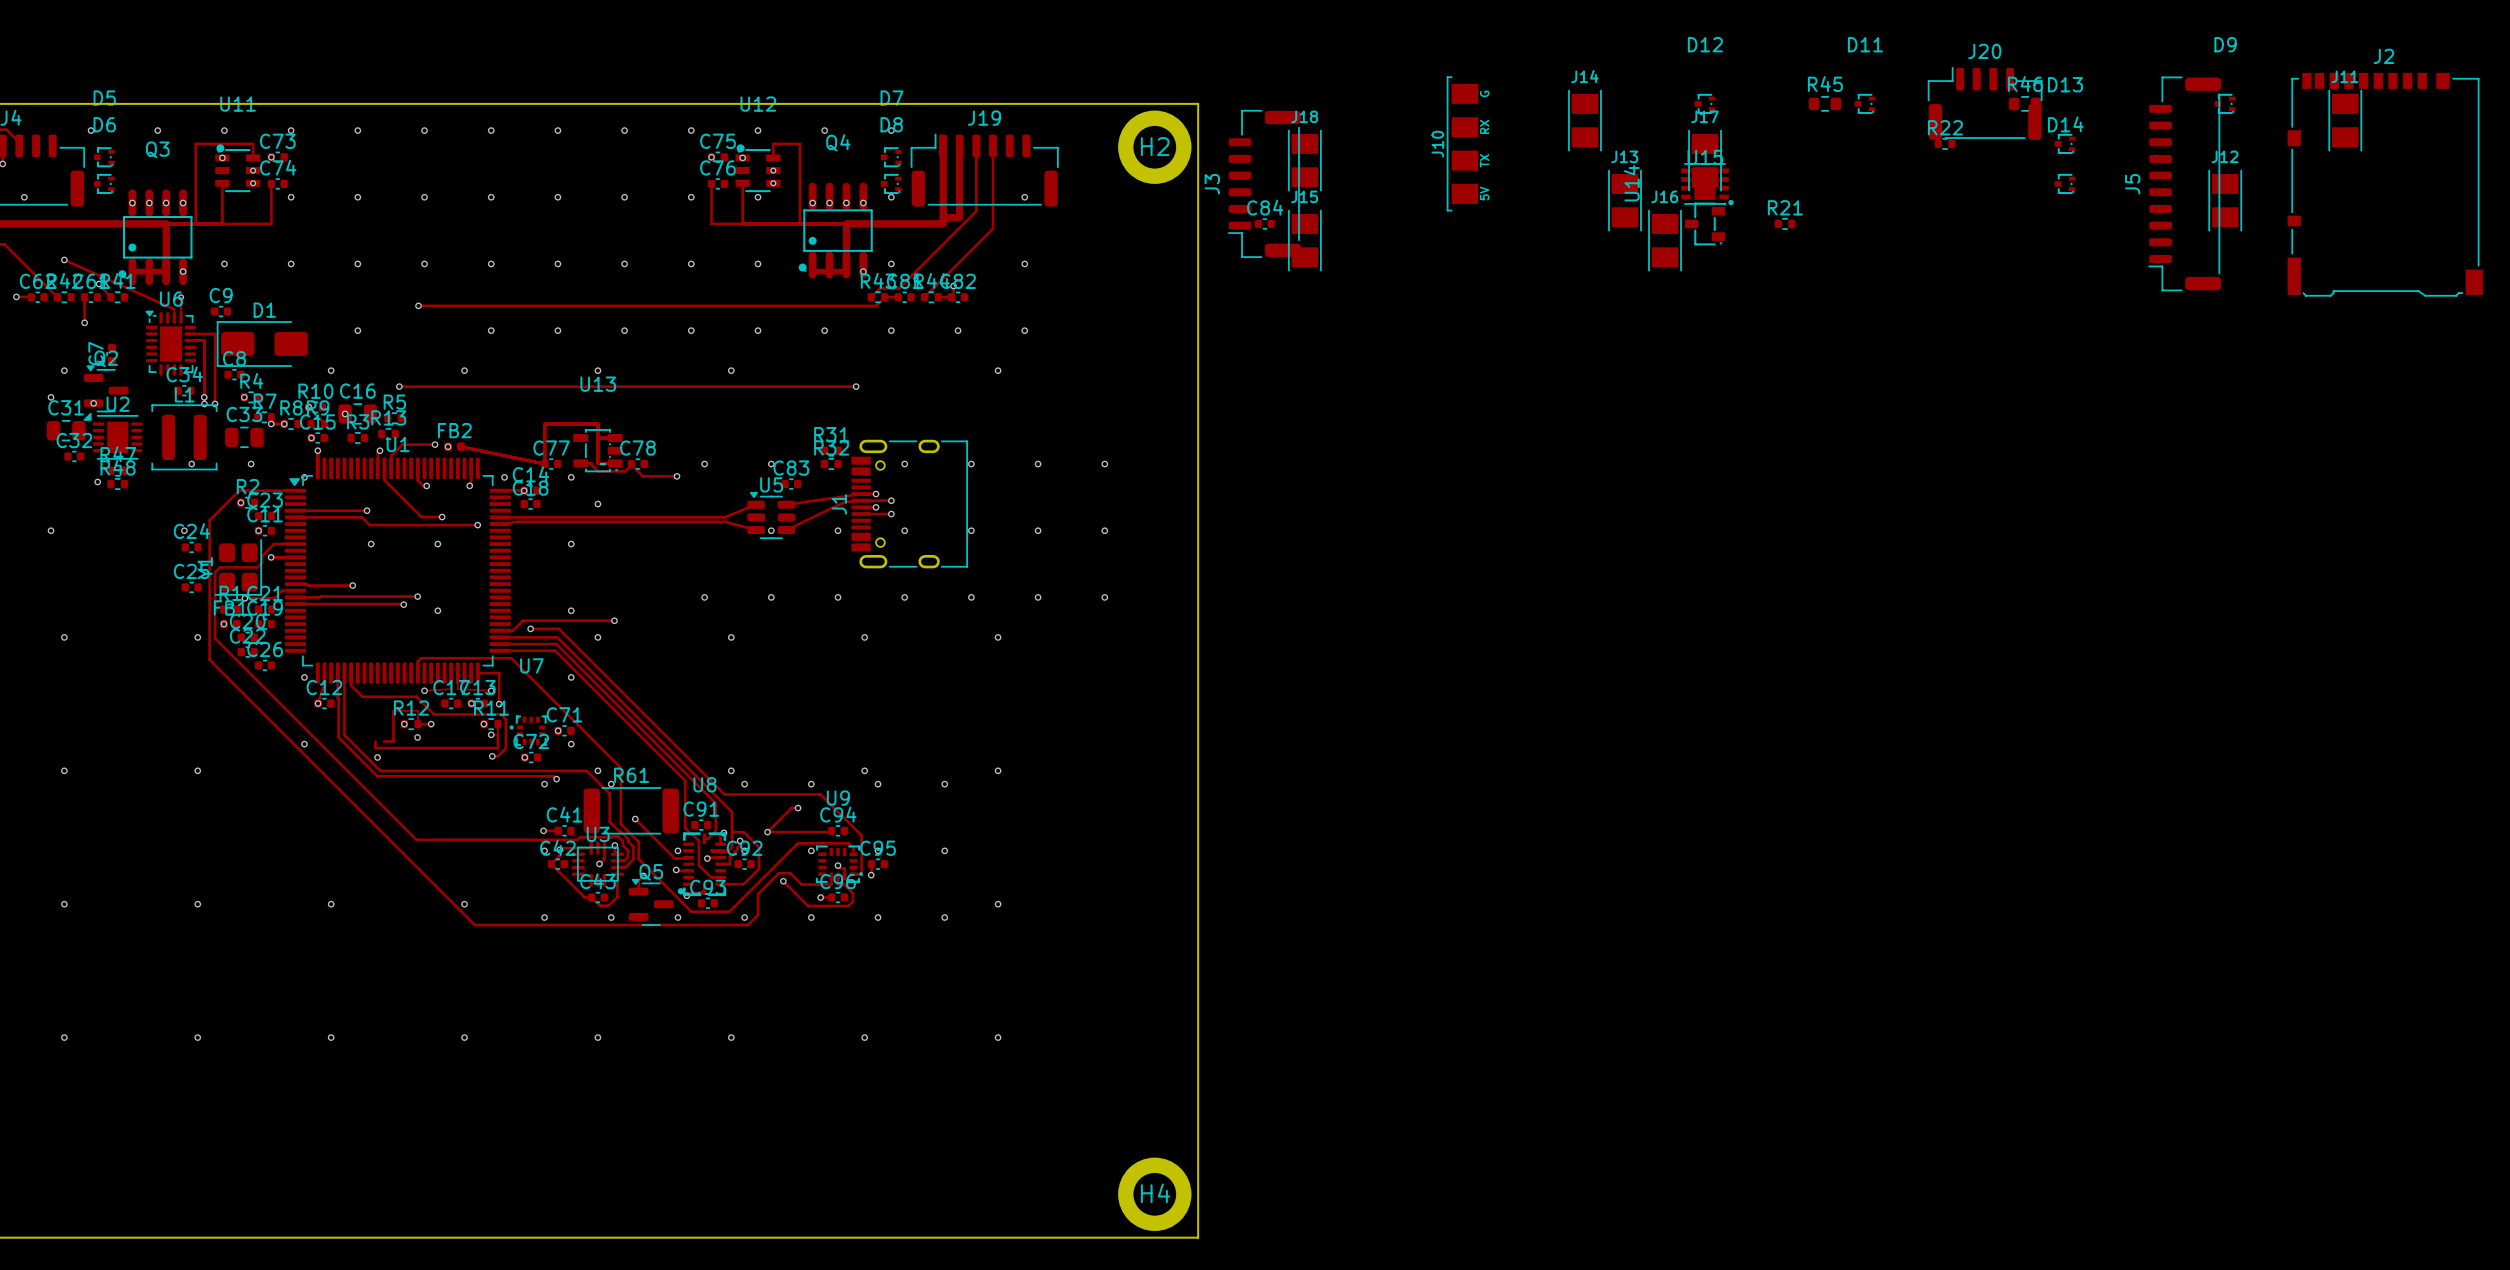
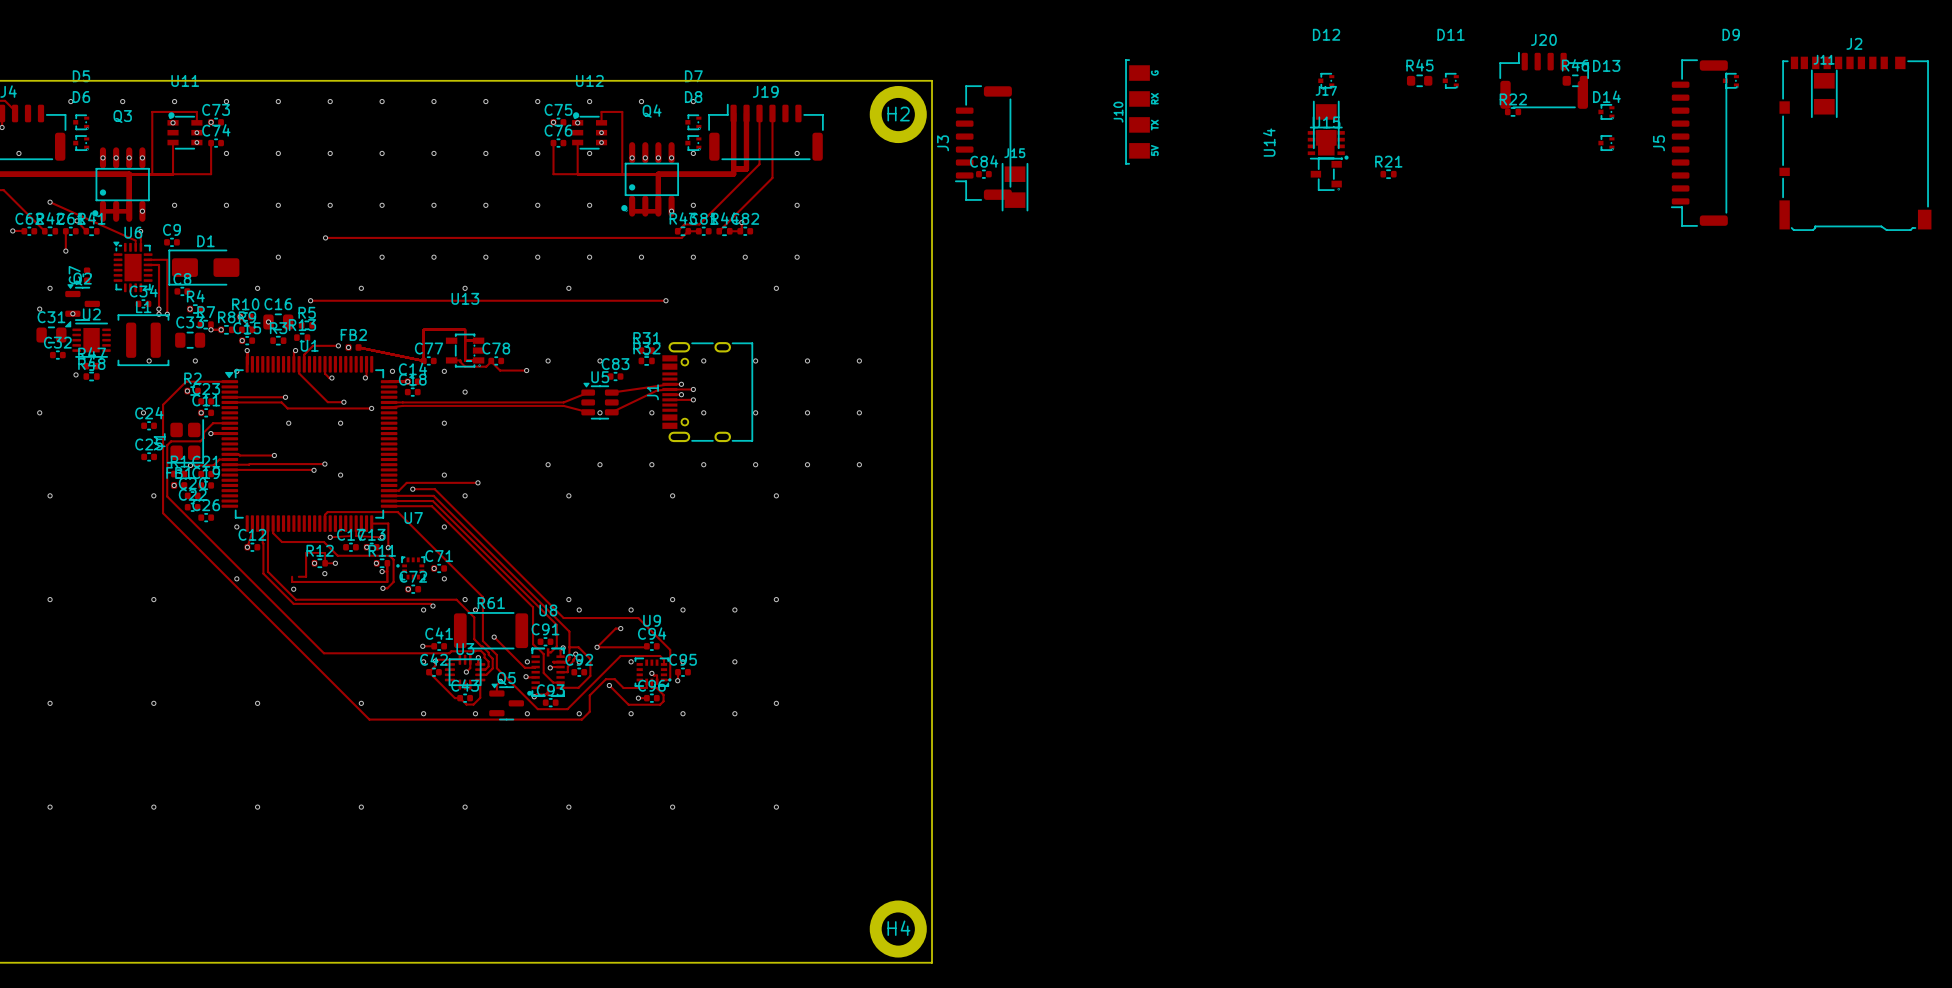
J14: (1584, 120) -> none
J18: (1304, 160) -> none
J13: (1624, 200) -> none
J12: (2225, 200) -> none
J16: (1665, 240) -> none

